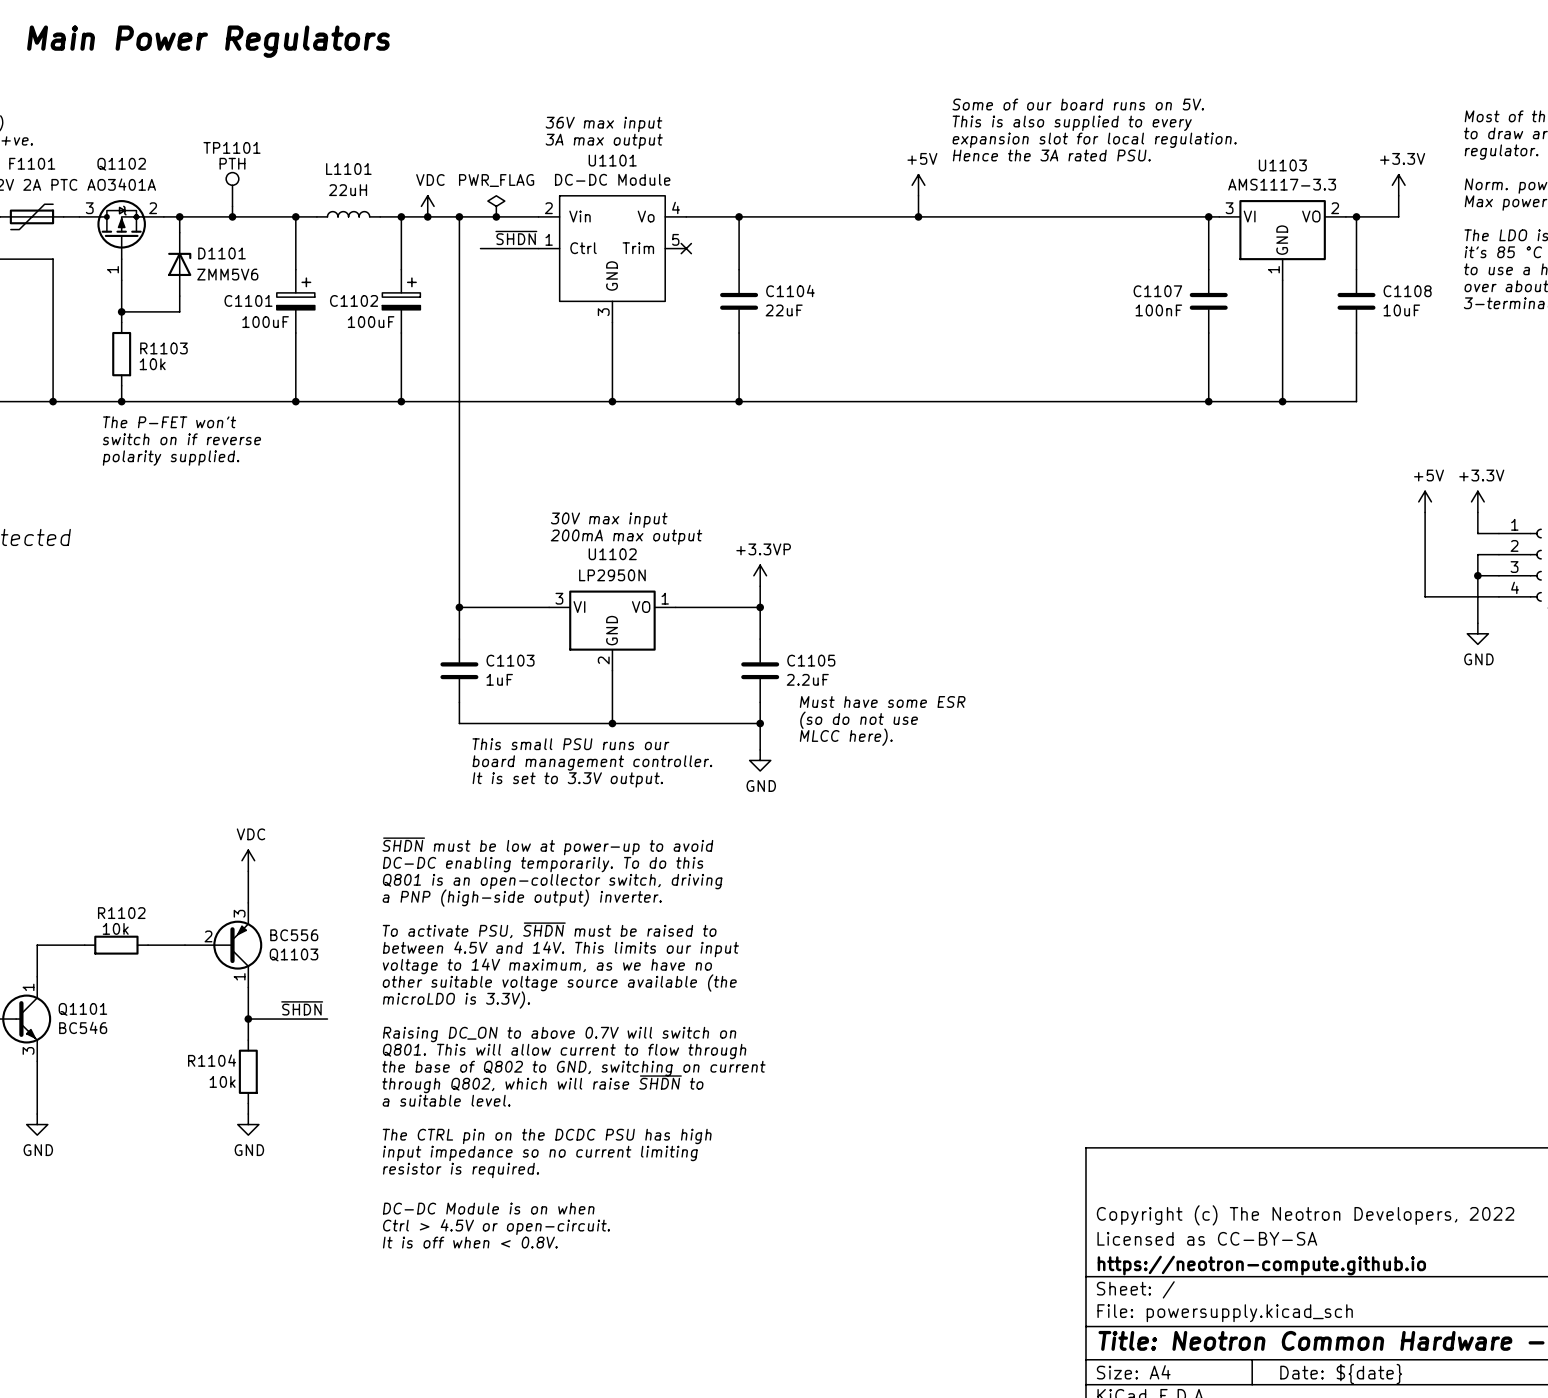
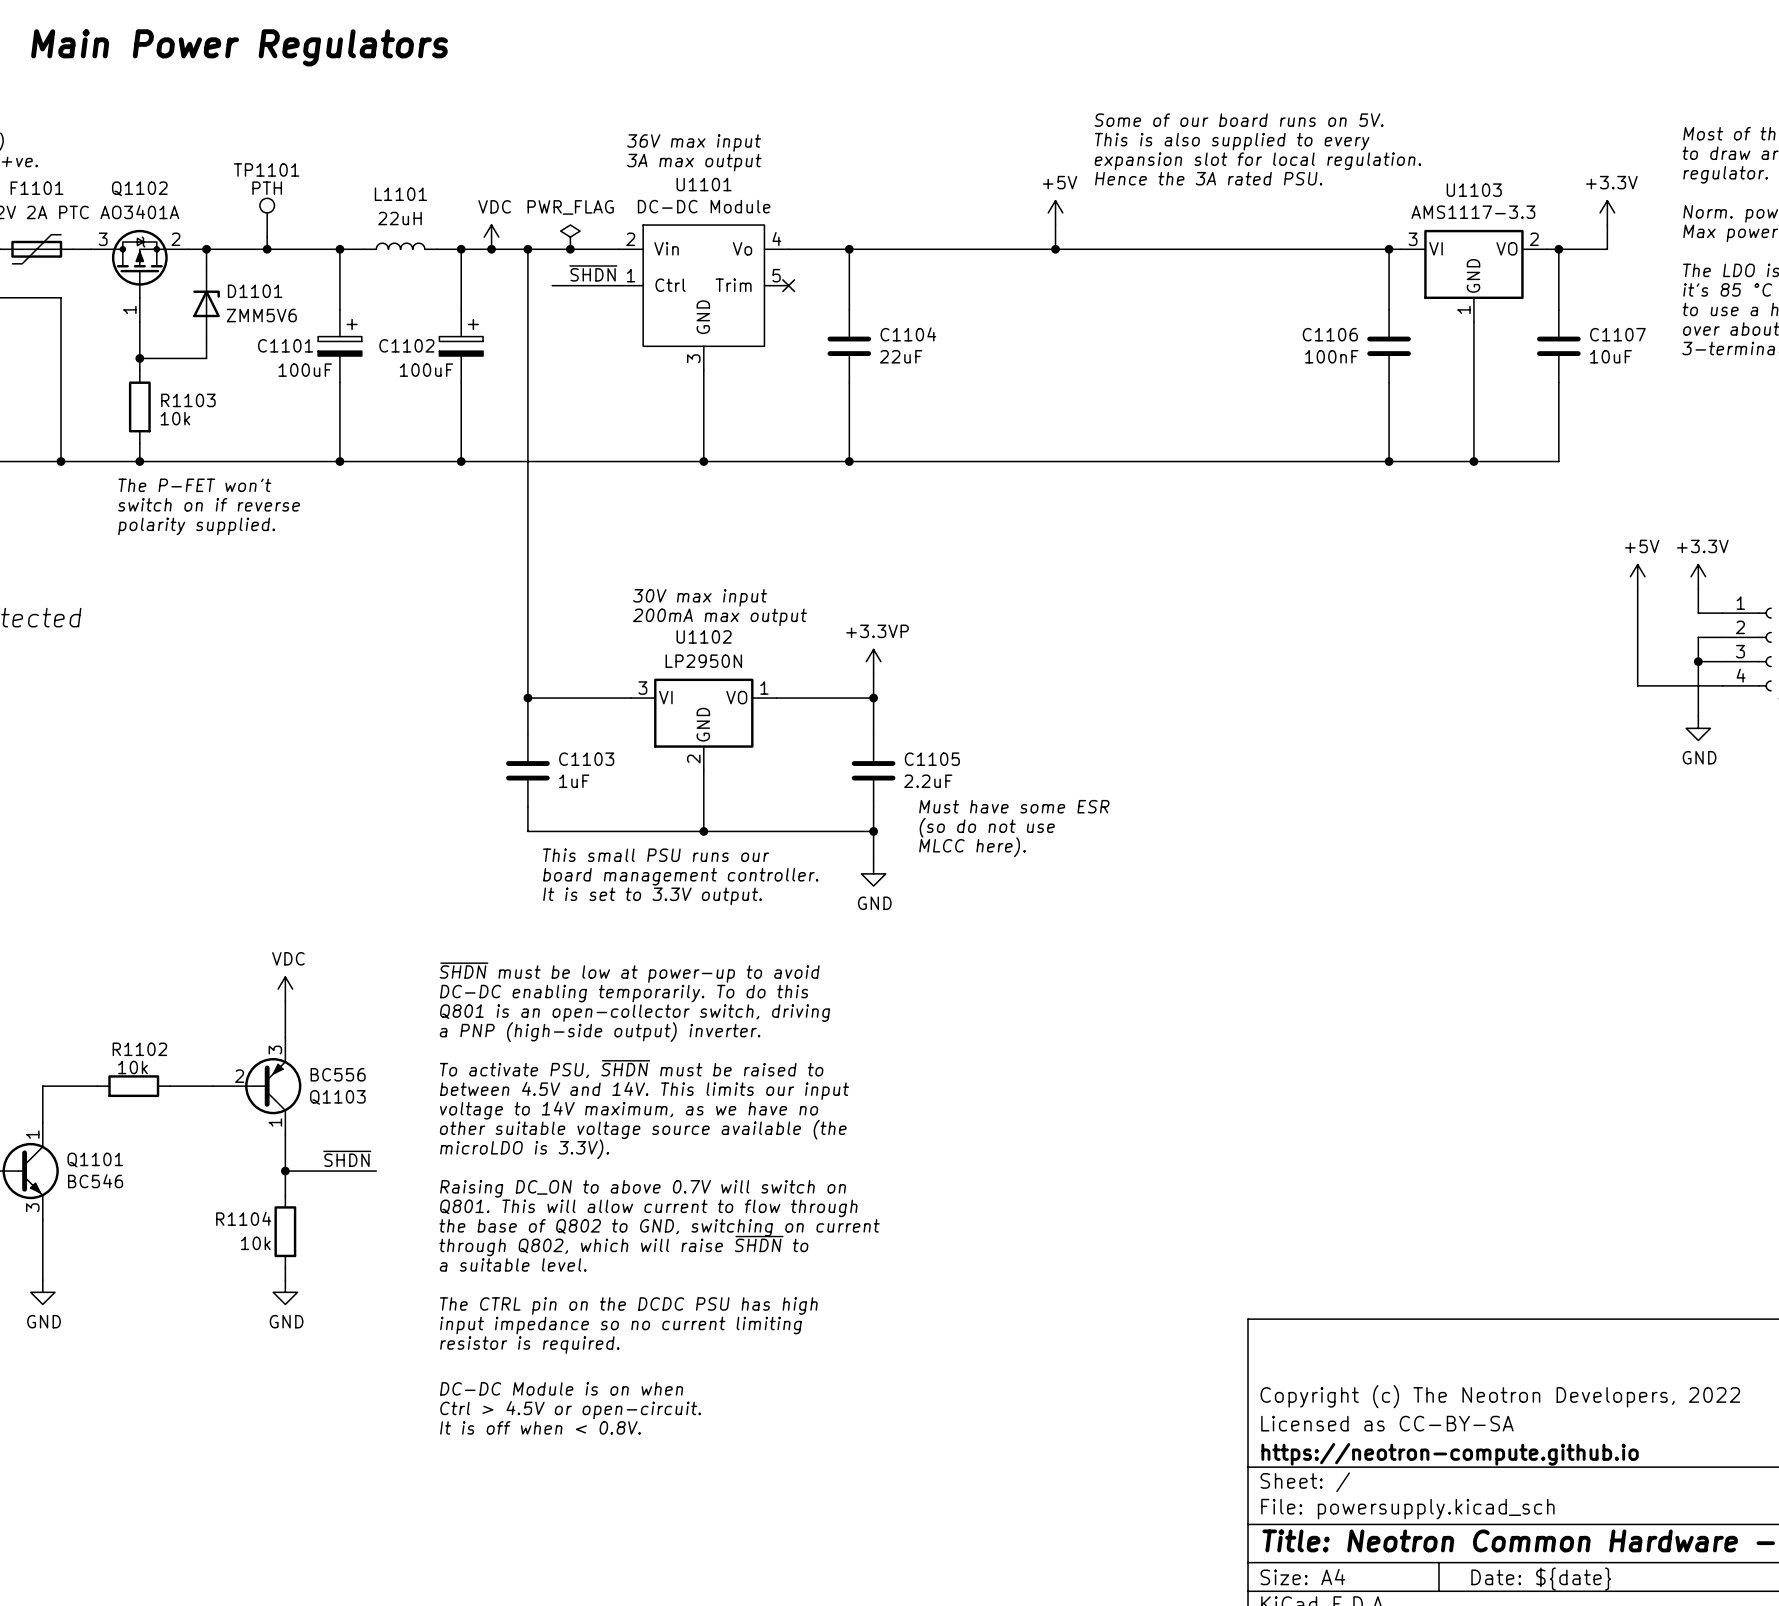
C1107 name: C1107 (1157, 291) -> C1106 (1330, 334)
C1108 name: C1108 (1407, 291) -> C1107 (1617, 334)

